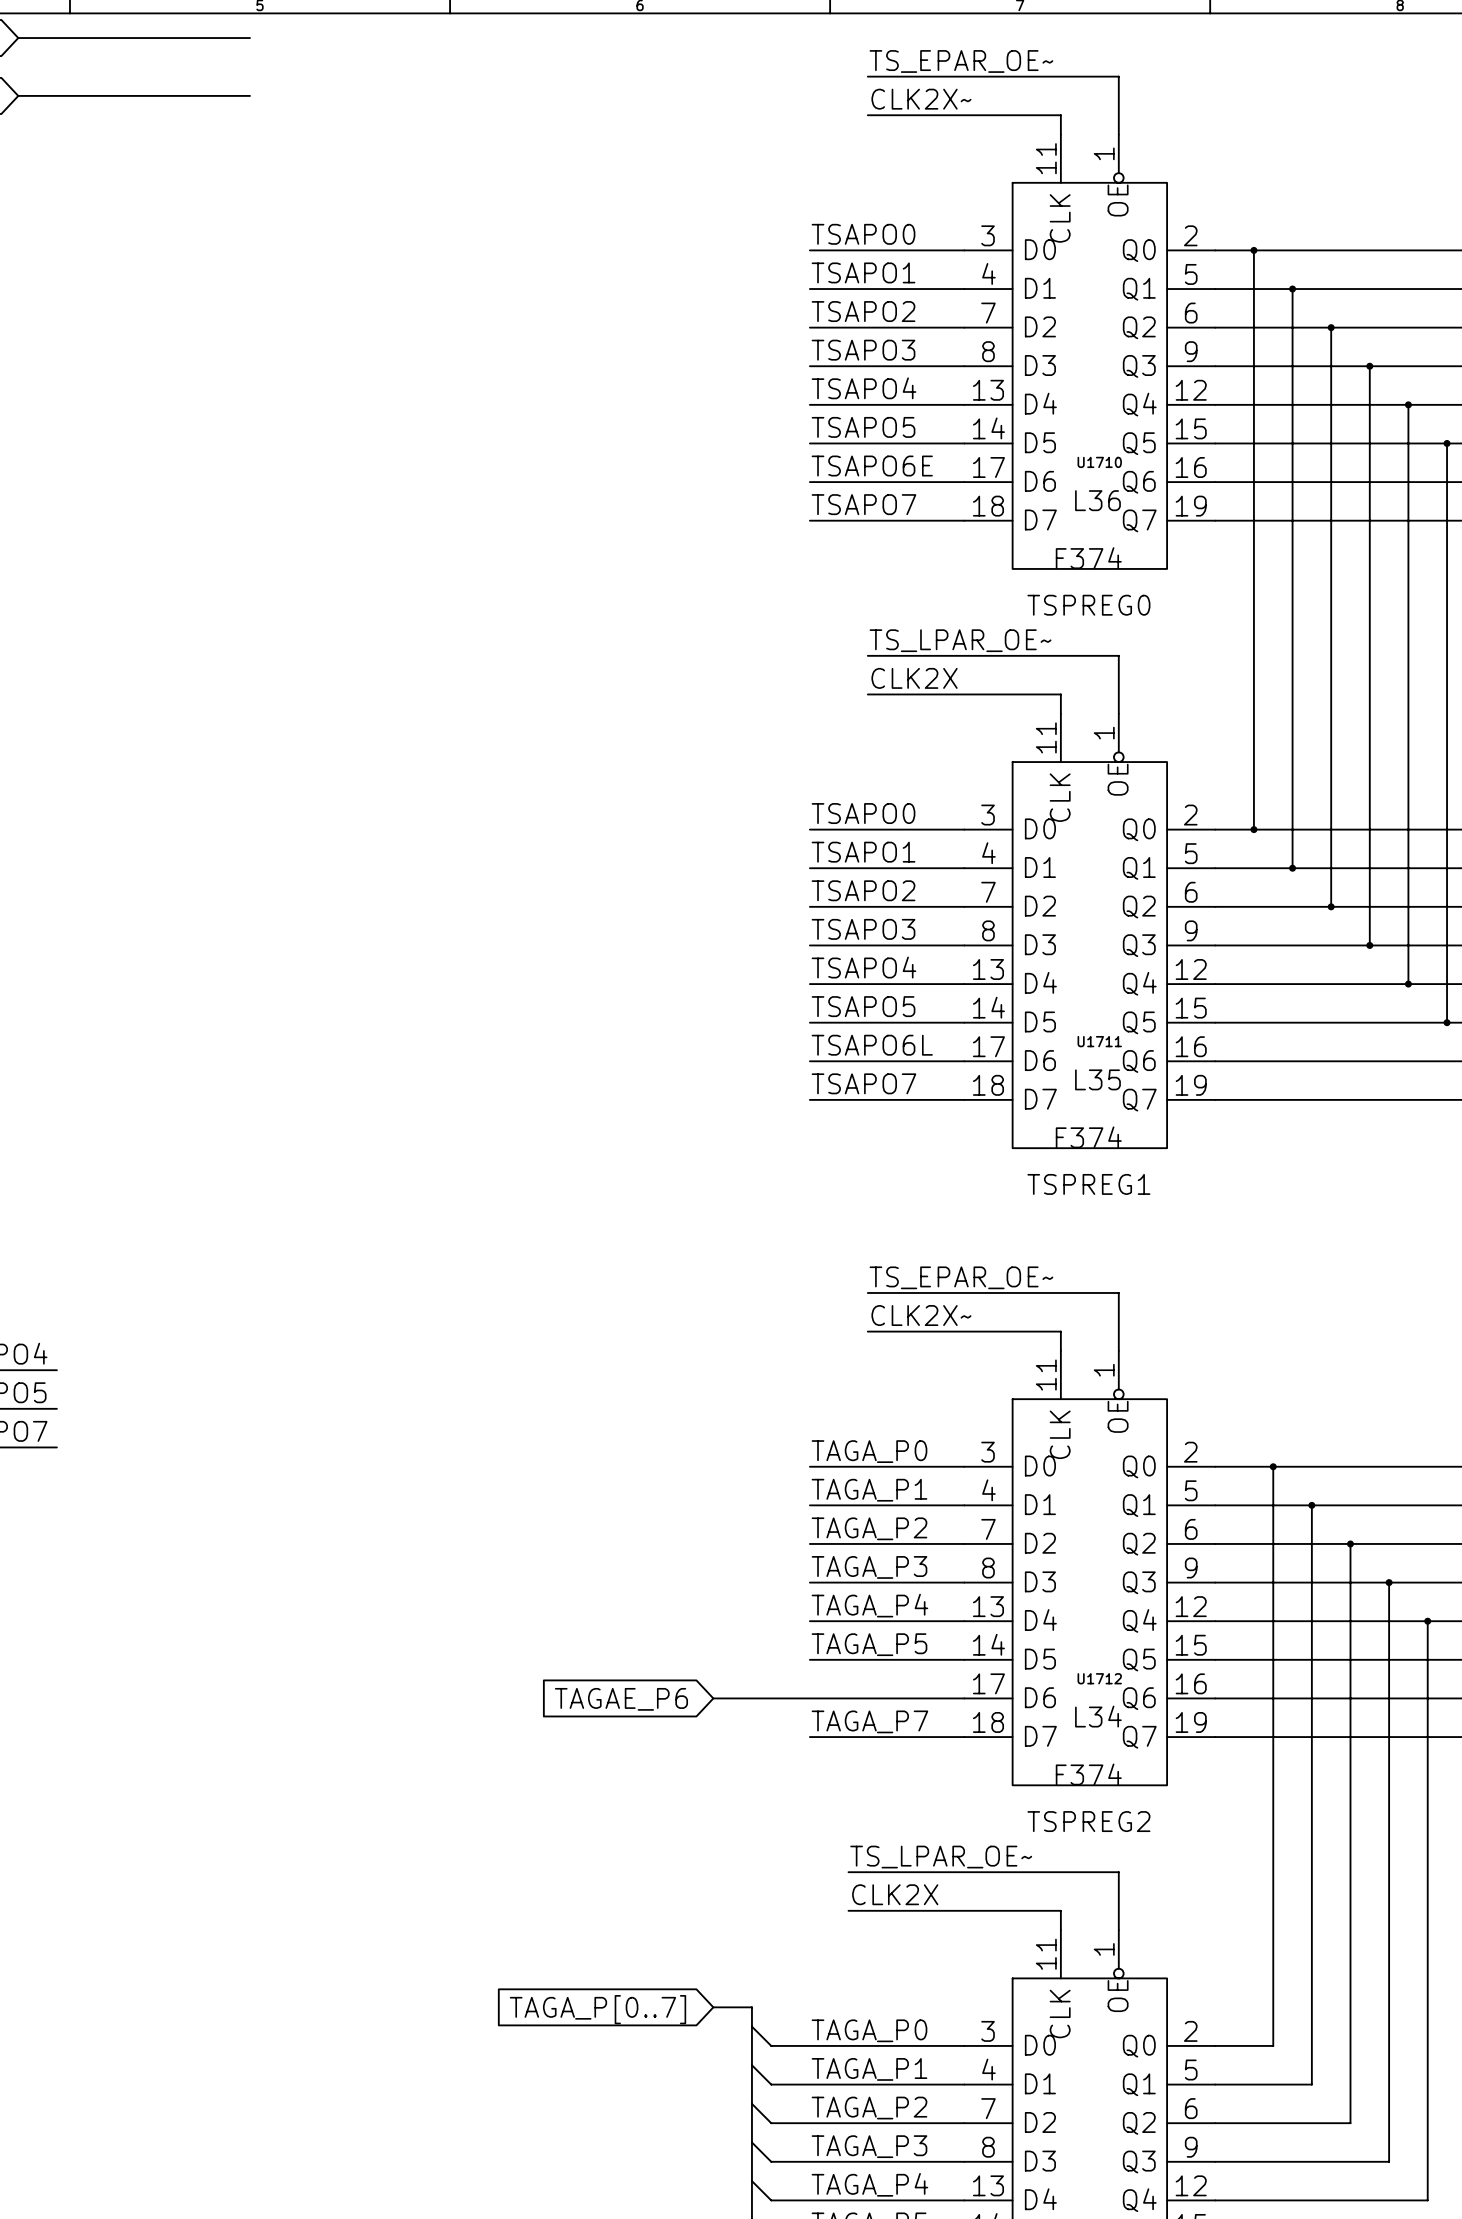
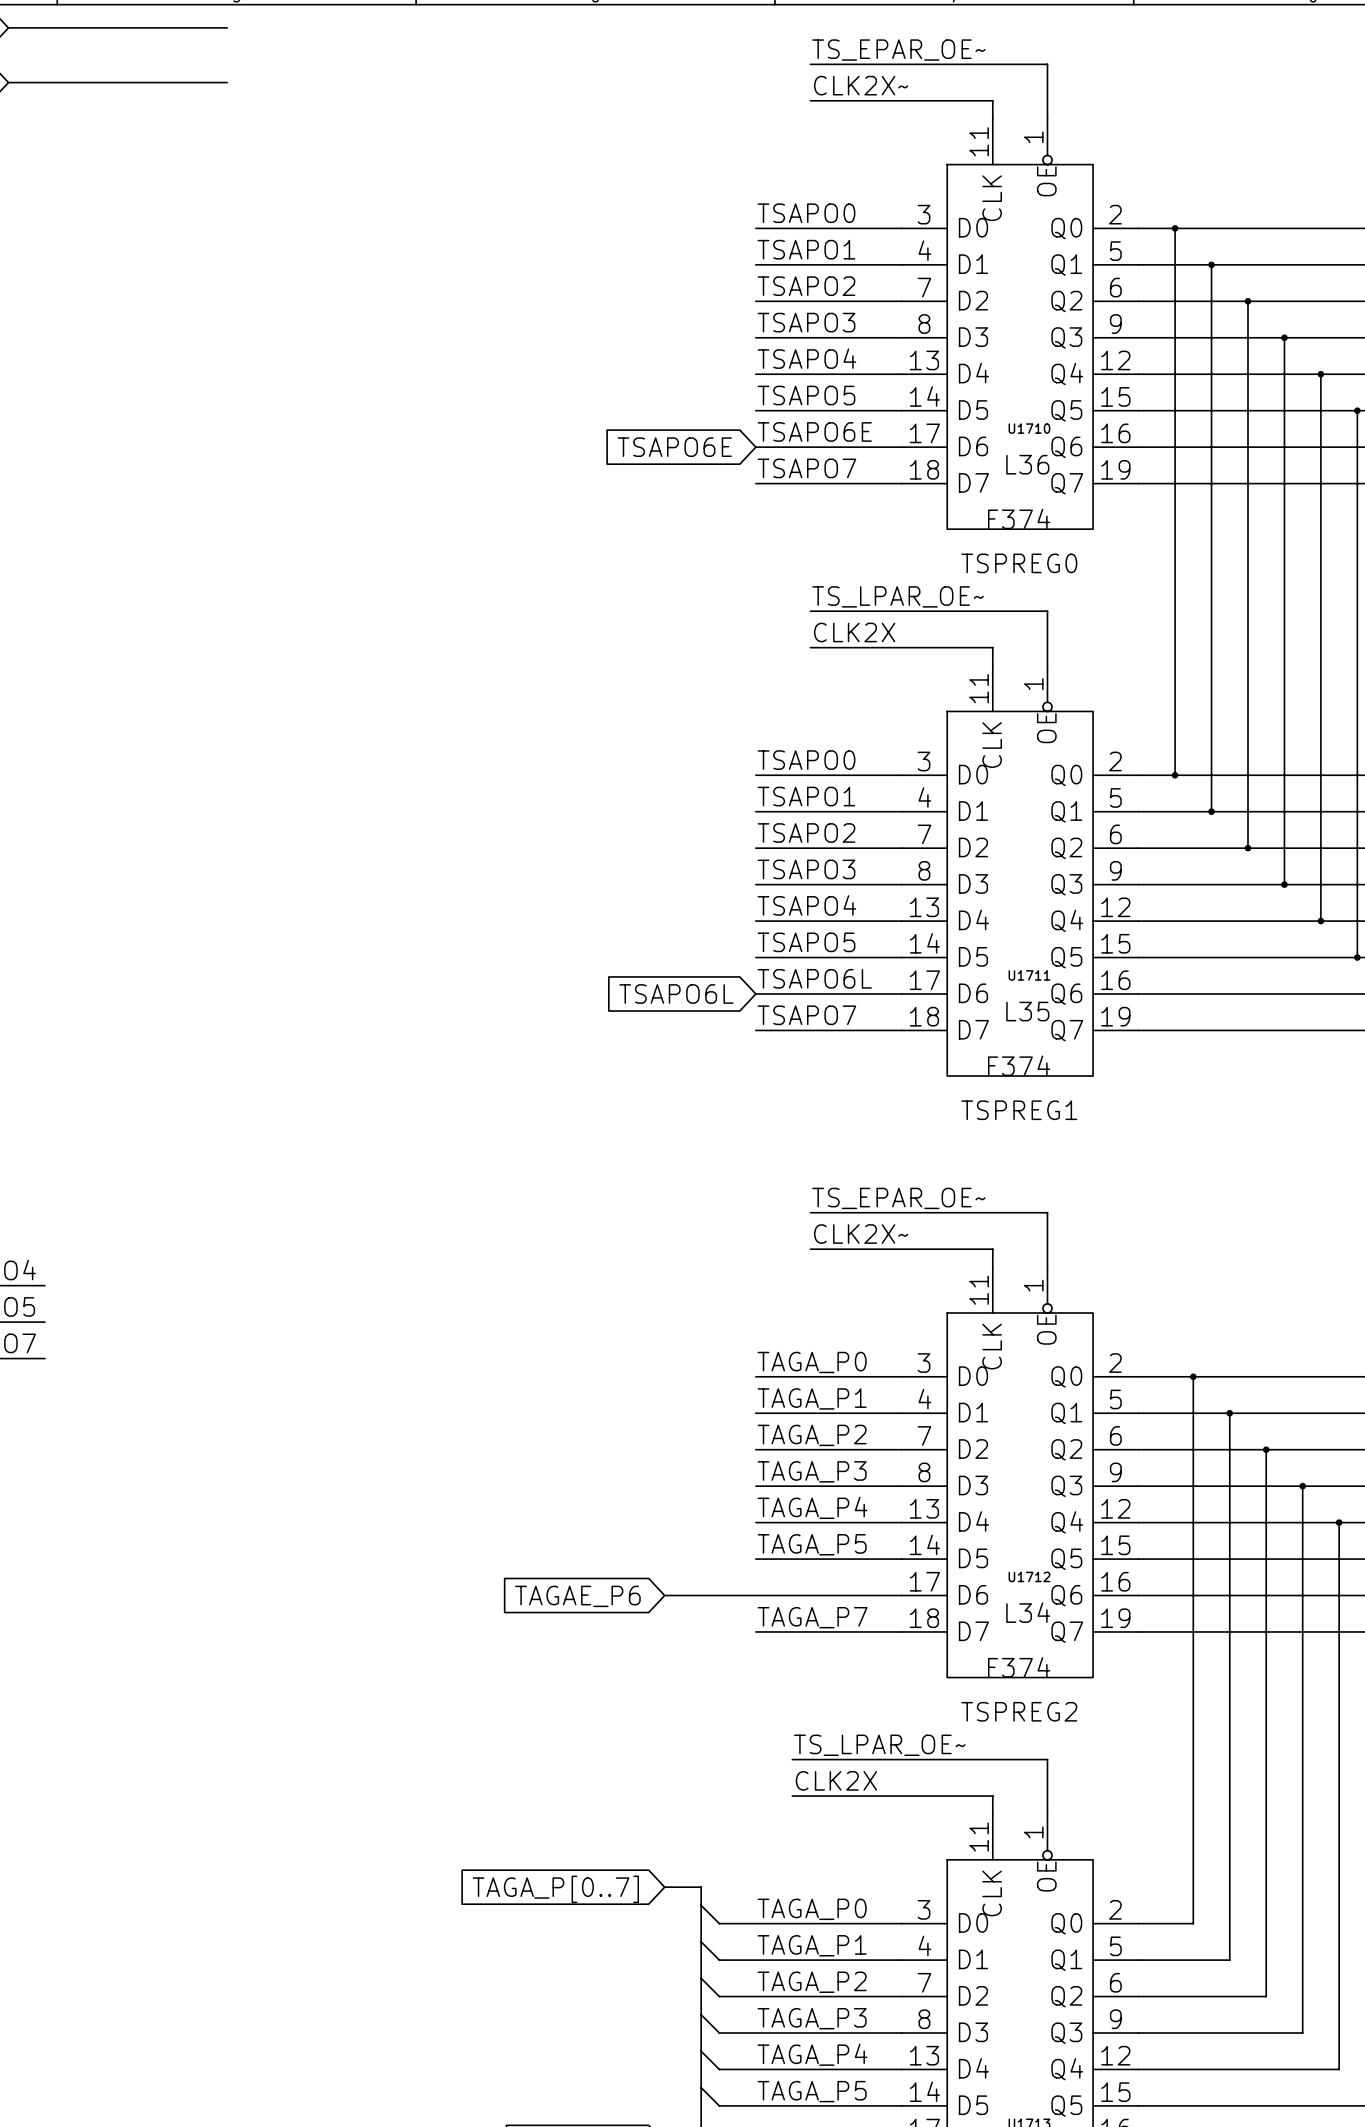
global label: none -> TSAPO6E (674, 447)
global label: none -> TSAPO6L (676, 993)

